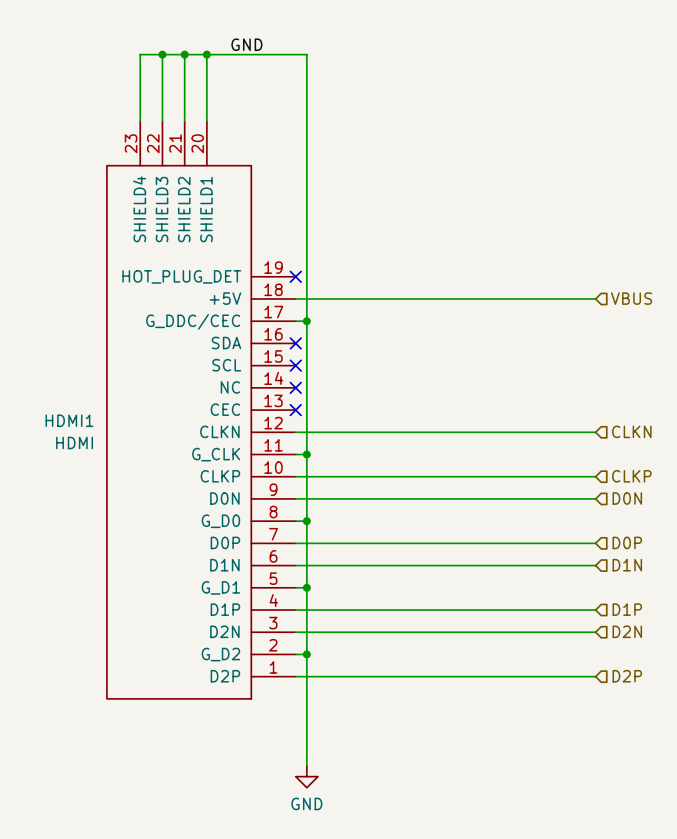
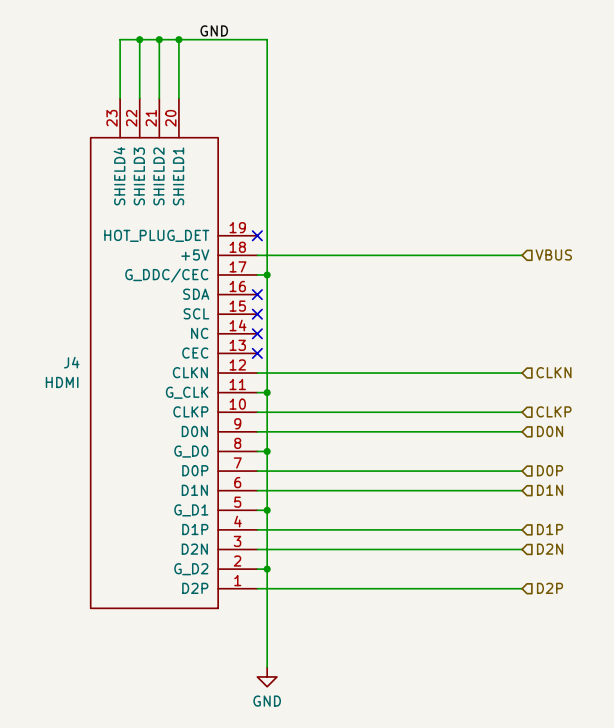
HDMI1 name: HDMI1 (69, 420) -> J4 (71, 362)

